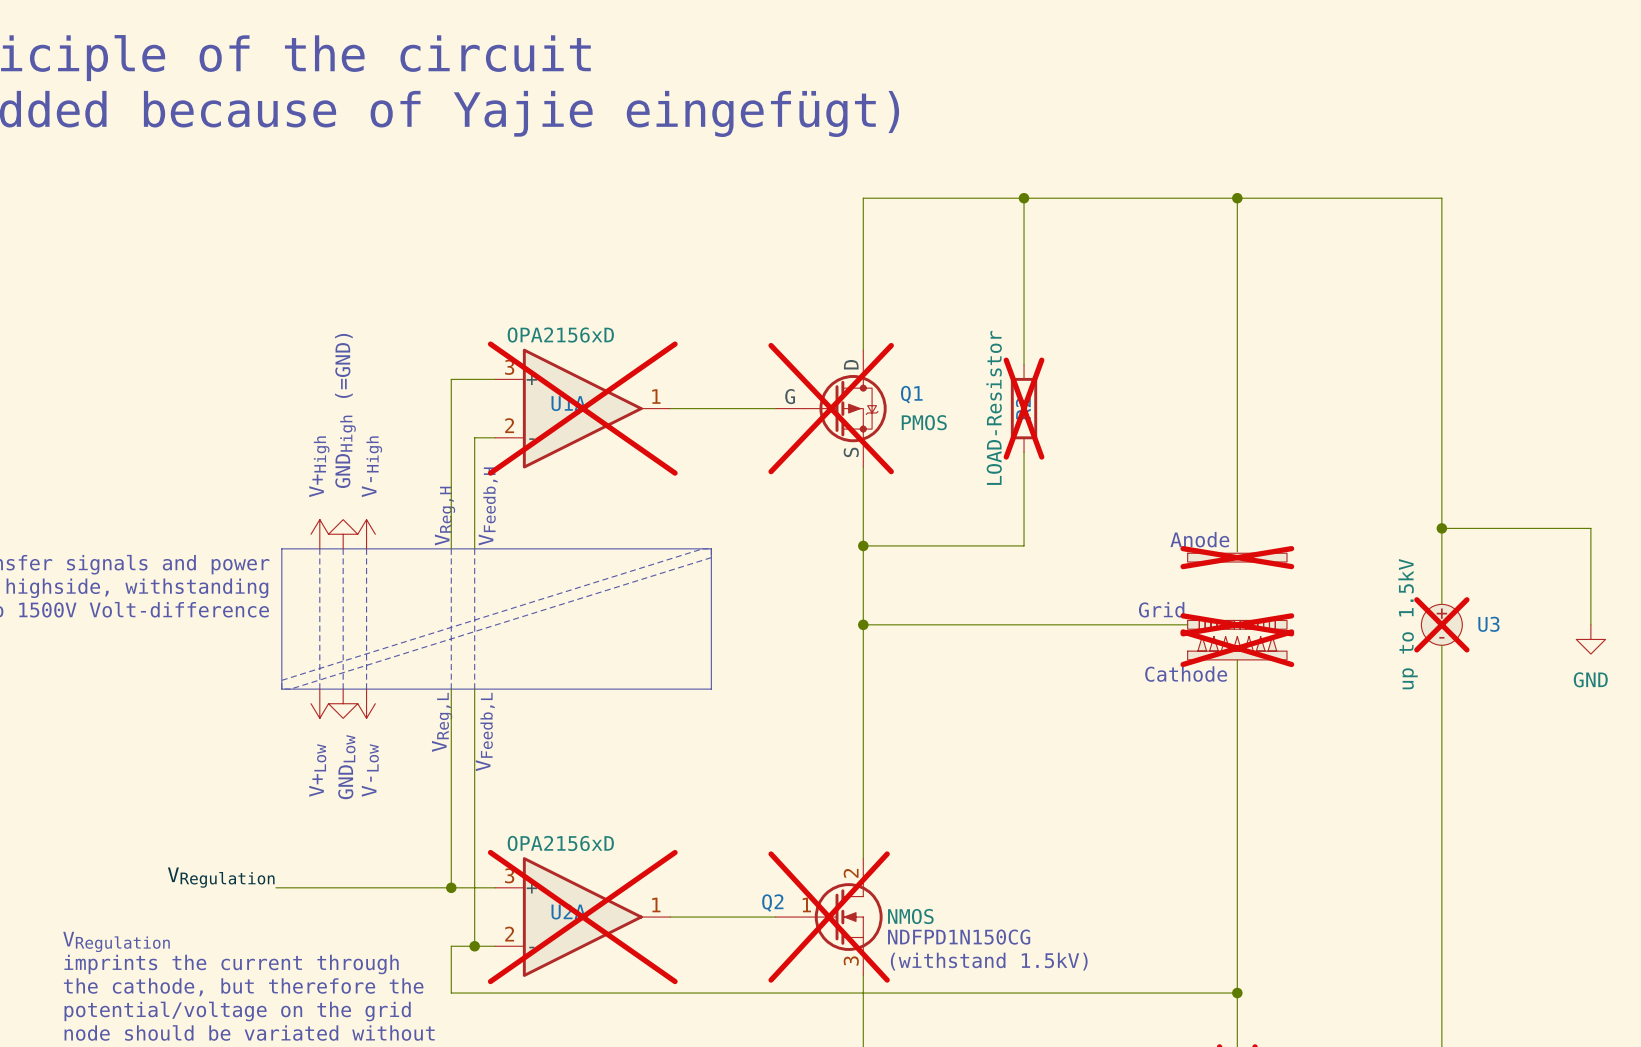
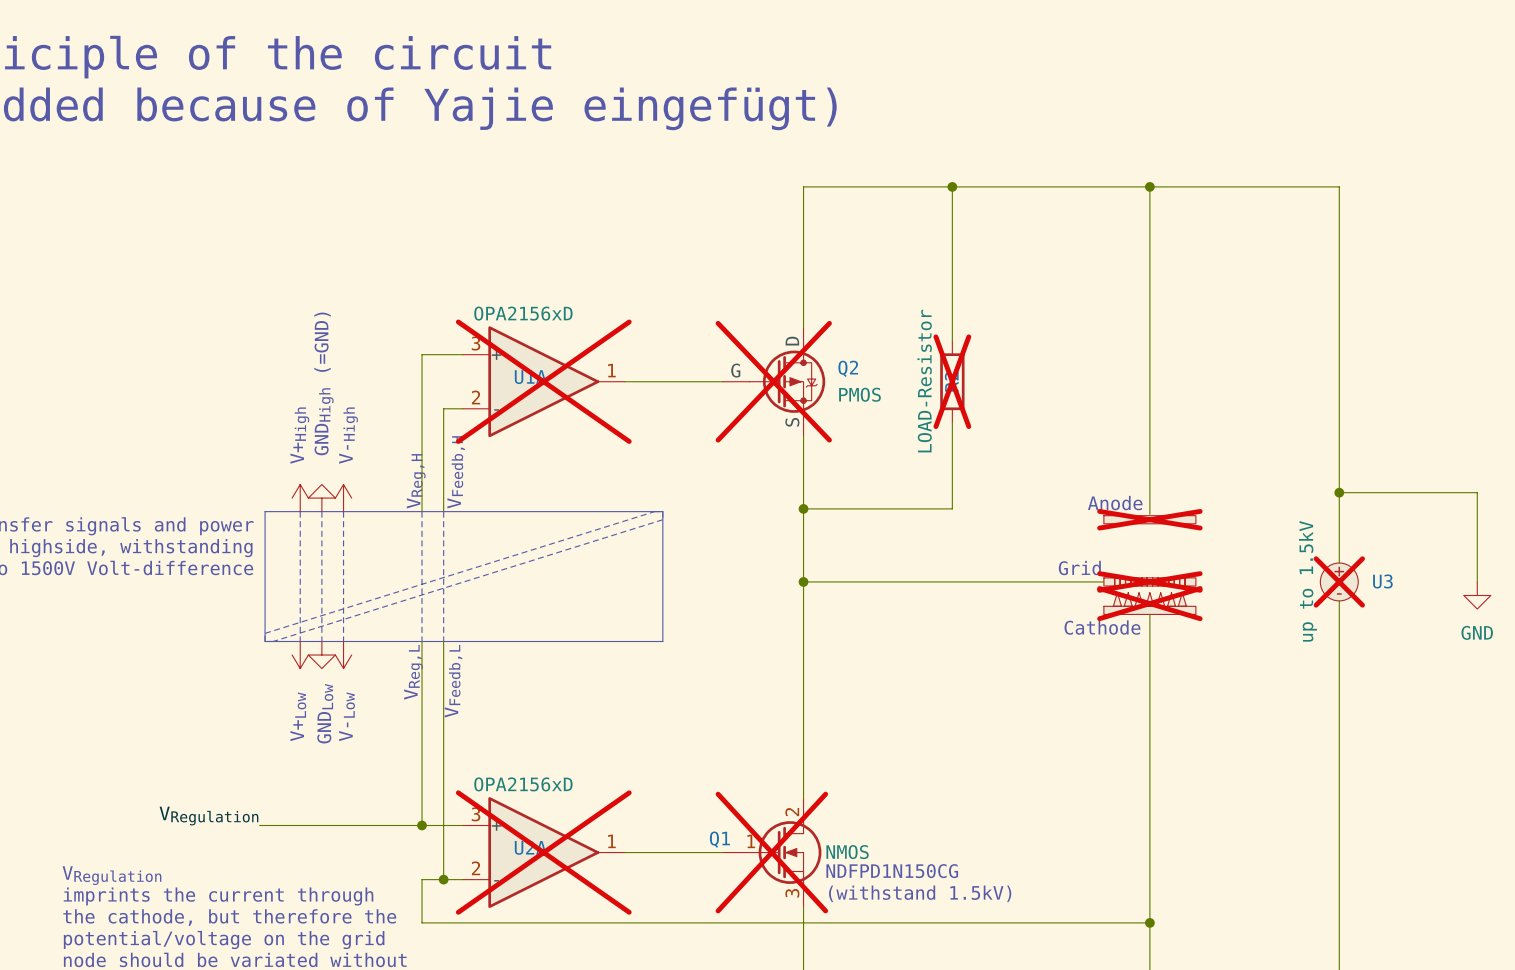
Q1 name: Q1 (911, 394) -> Q2 (848, 368)
Q2 name: Q2 (772, 903) -> Q1 (719, 839)

